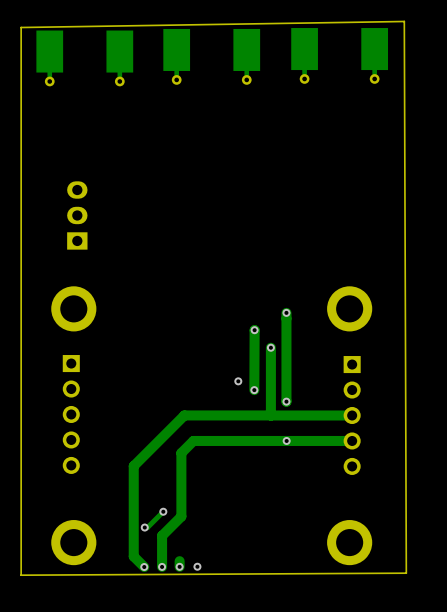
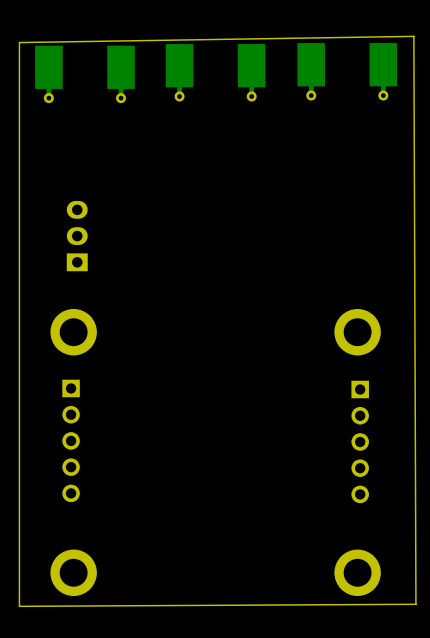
track: (286, 312) (286, 401) -> none
via: (286, 312) -> none
track: (254, 330) (254, 390) -> none
via: (254, 330) -> none
track: (270, 347) (270, 415) (184, 415) (133, 466) (133, 556) (144, 567) -> none
via: (270, 347) -> none
via: (238, 381) -> none
via: (254, 390) -> none
via: (286, 401) -> none
track: (352, 415) (270, 415) -> none
via: (286, 440) -> none
track: (352, 440) (193, 440) (181, 453) (181, 516) (162, 535) (162, 566) -> none
track: (163, 511) (147, 527) (144, 527) -> none
via: (163, 511) -> none
via: (144, 527) -> none
track: (179, 561) (179, 566) -> none
via: (162, 566) -> none
via: (179, 566) -> none
via: (197, 566) -> none
via: (144, 567) -> none

